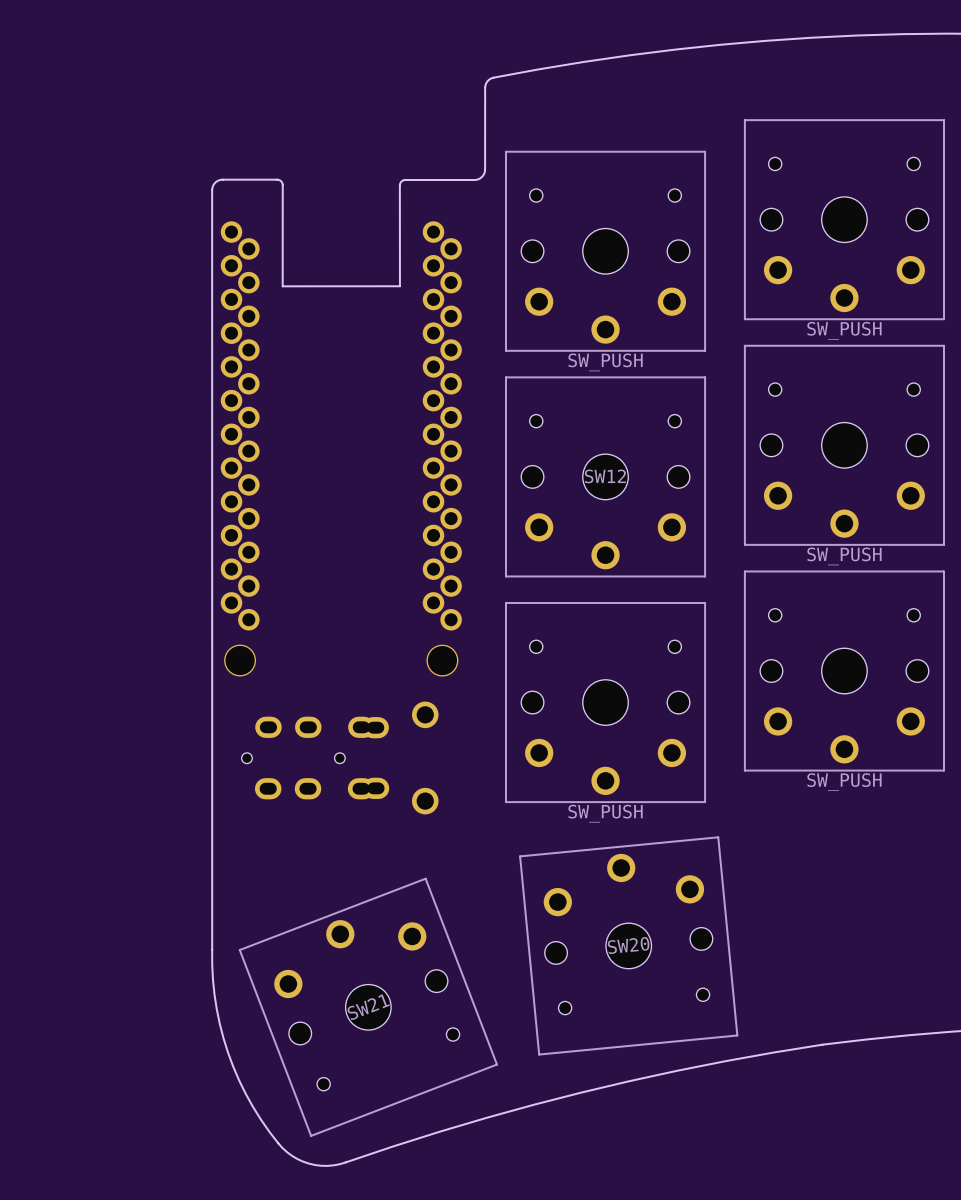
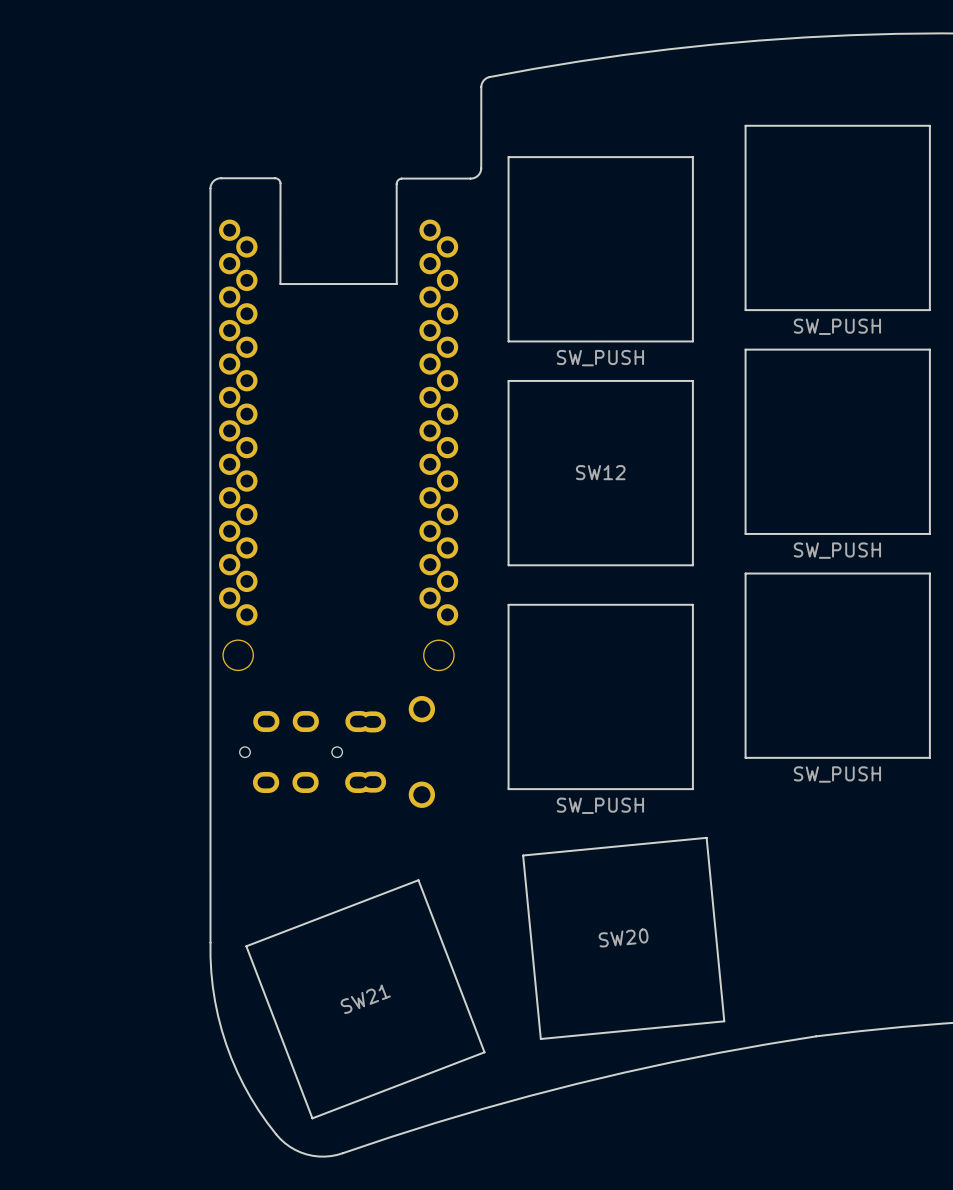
drawing: none -> [744, 124, 931, 759]
drawing: none -> [507, 156, 694, 343]
part: SW_PUSH (844, 219) -> none
part: SW_PUSH (605, 251) -> none
SW12 footprint: [505, 376, 707, 578] -> [507, 379, 694, 567]
part: SW_PUSH (844, 445) -> none
drawing: none -> [507, 603, 694, 791]
part: SW_PUSH (844, 671) -> none
part: SW_PUSH (605, 702) -> none
SW20 footprint: [519, 836, 739, 1056] -> [522, 836, 726, 1040]
SW21 footprint: [238, 877, 498, 1137] -> [245, 879, 486, 1120]

